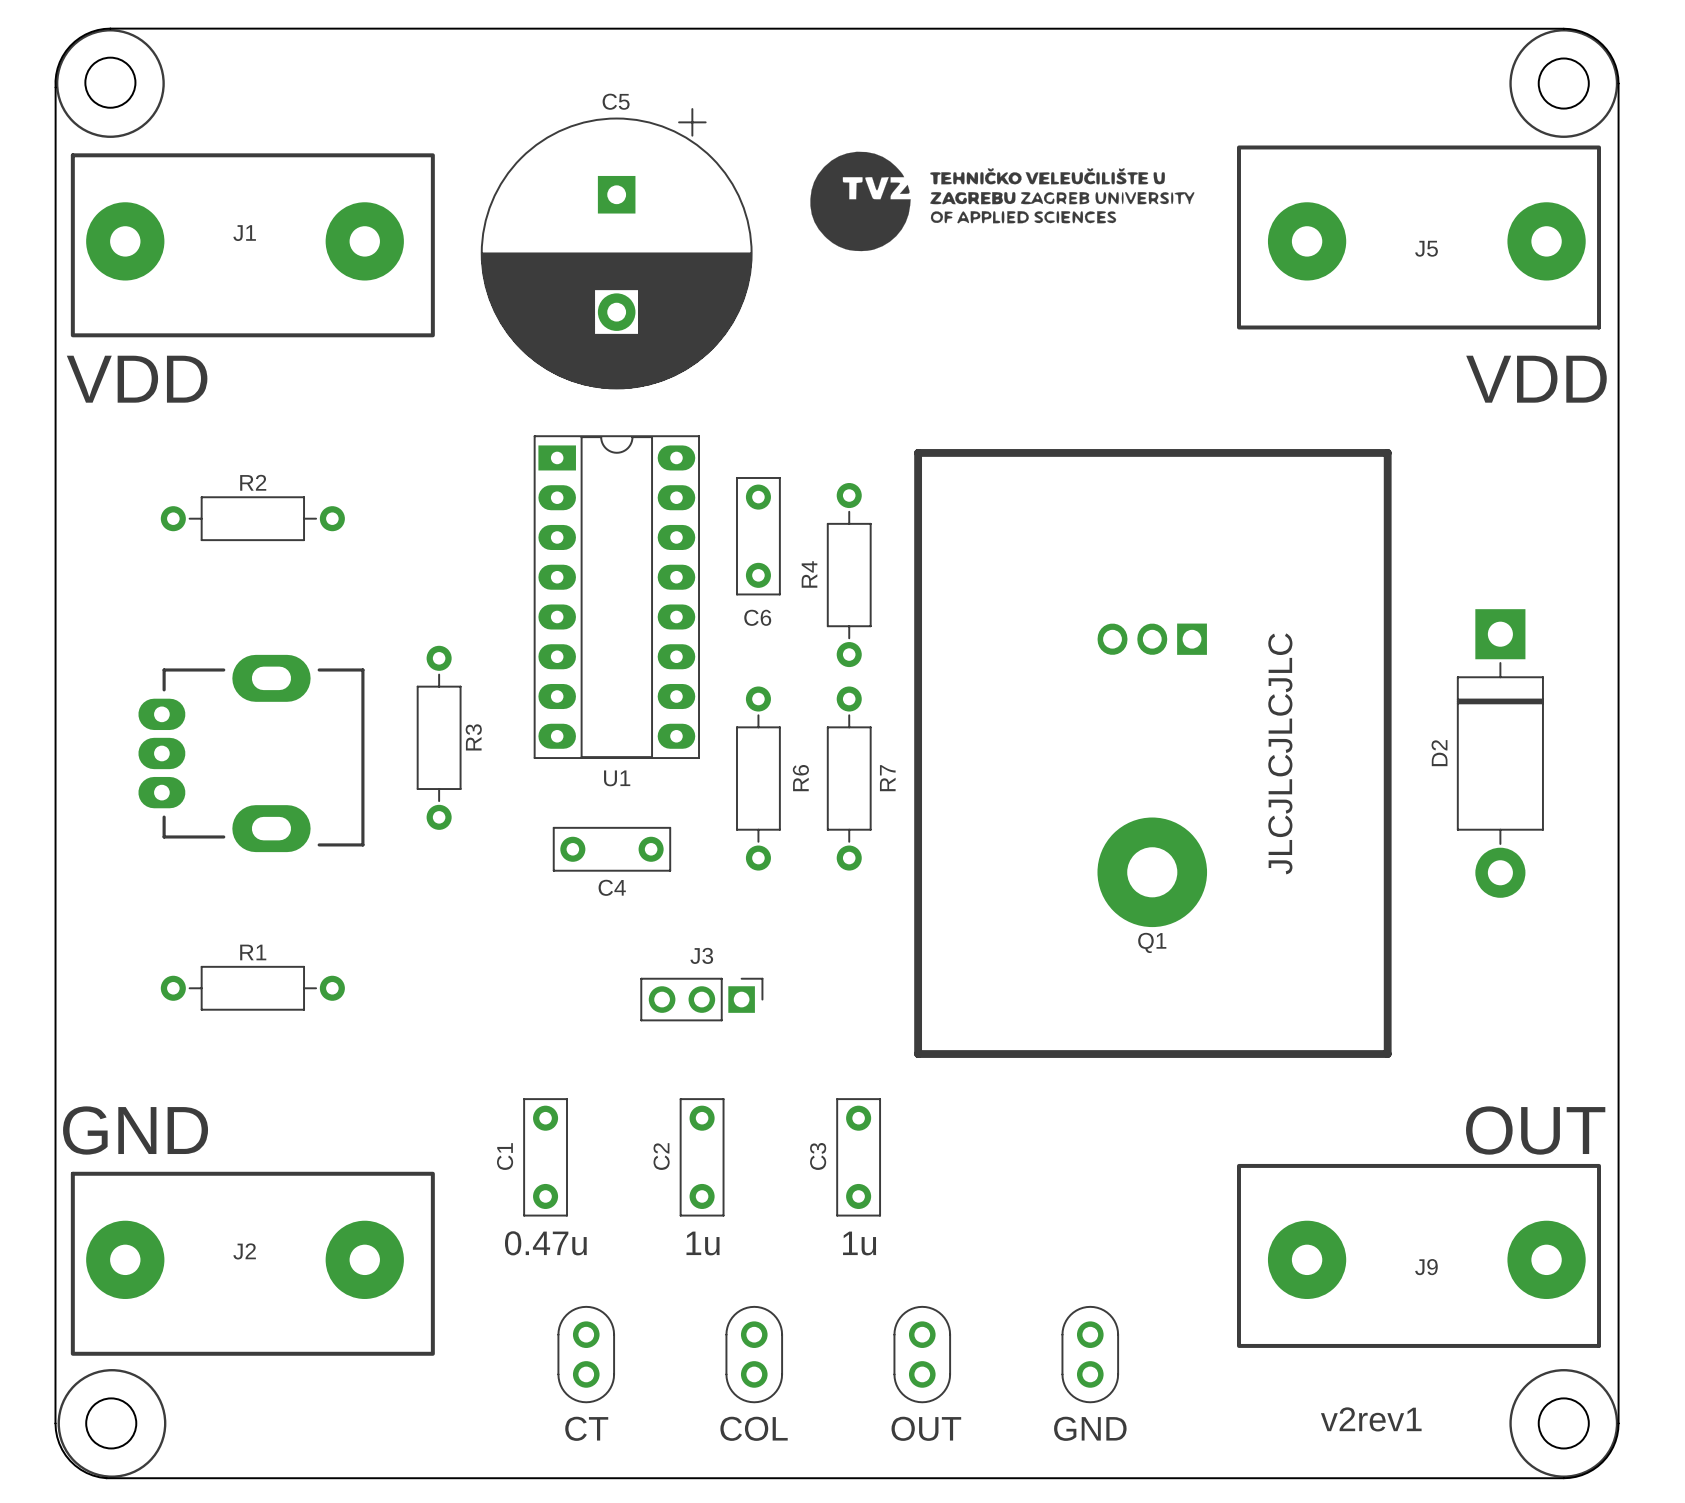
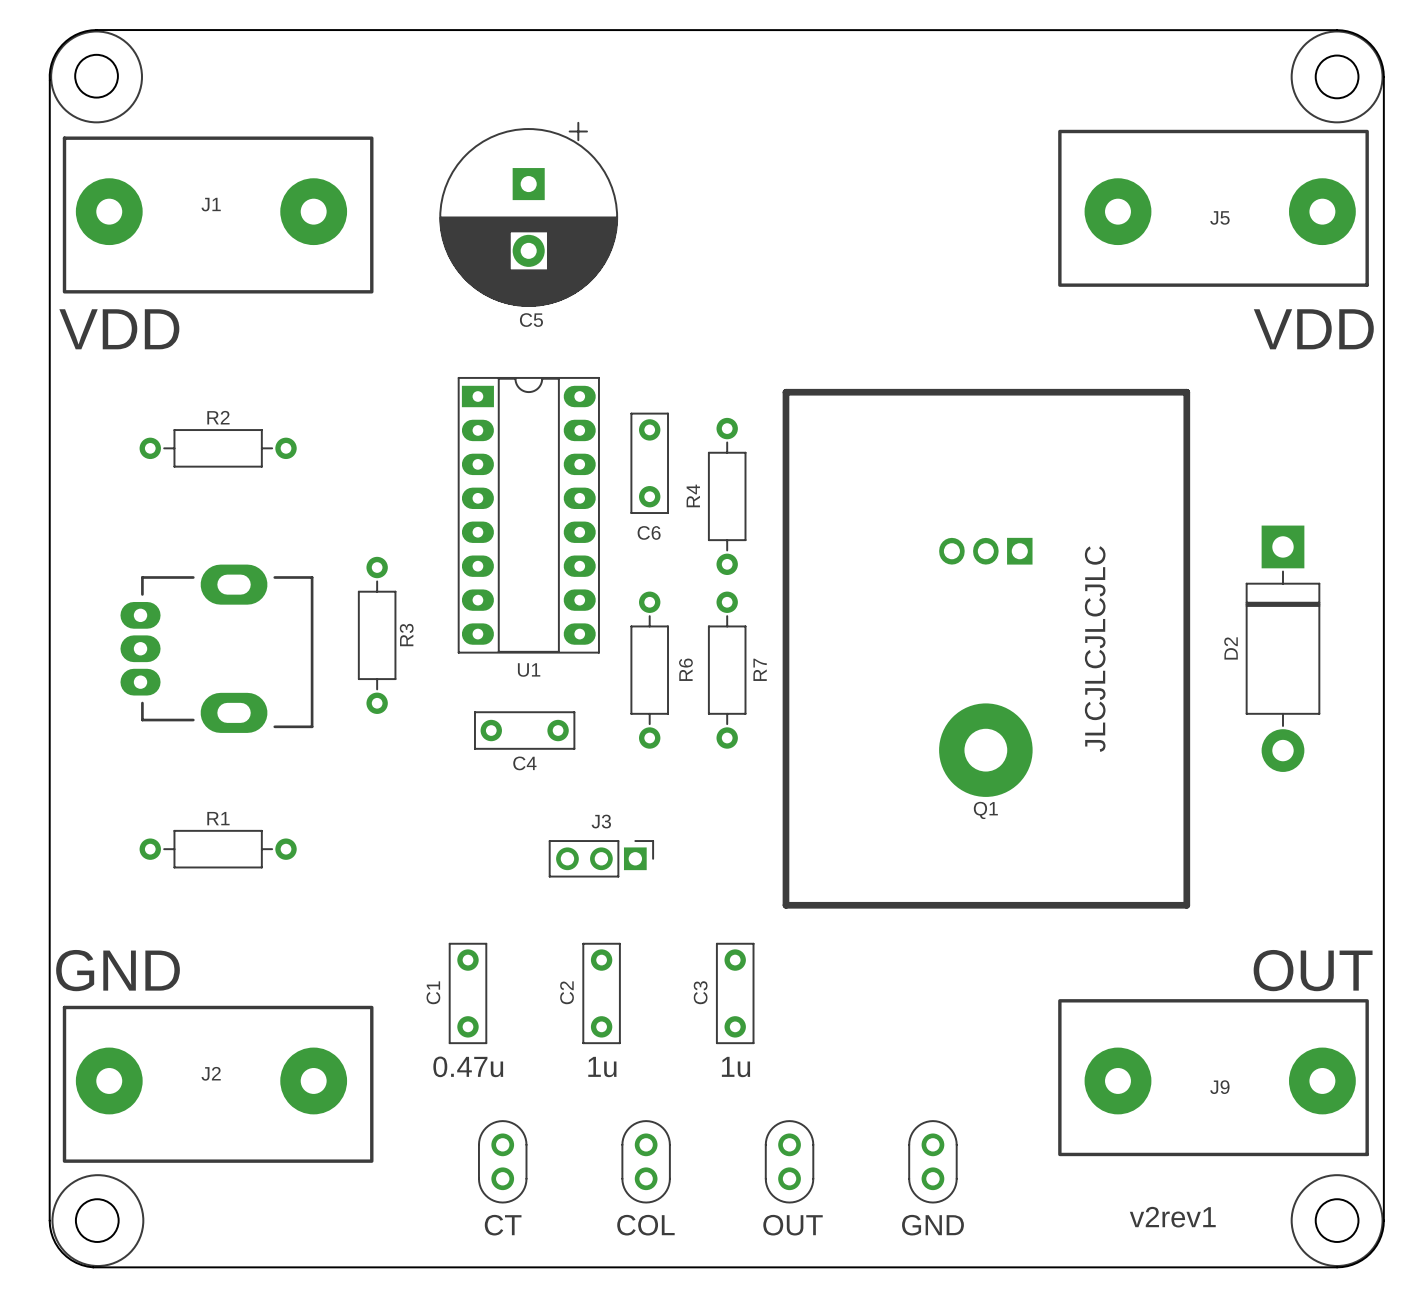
C5 name position: C5 (616, 101) -> C5 (531, 320)
C5 footprint: [480, 108, 753, 390] -> [439, 122, 618, 307]
drawing: [810, 151, 1195, 252] -> none

